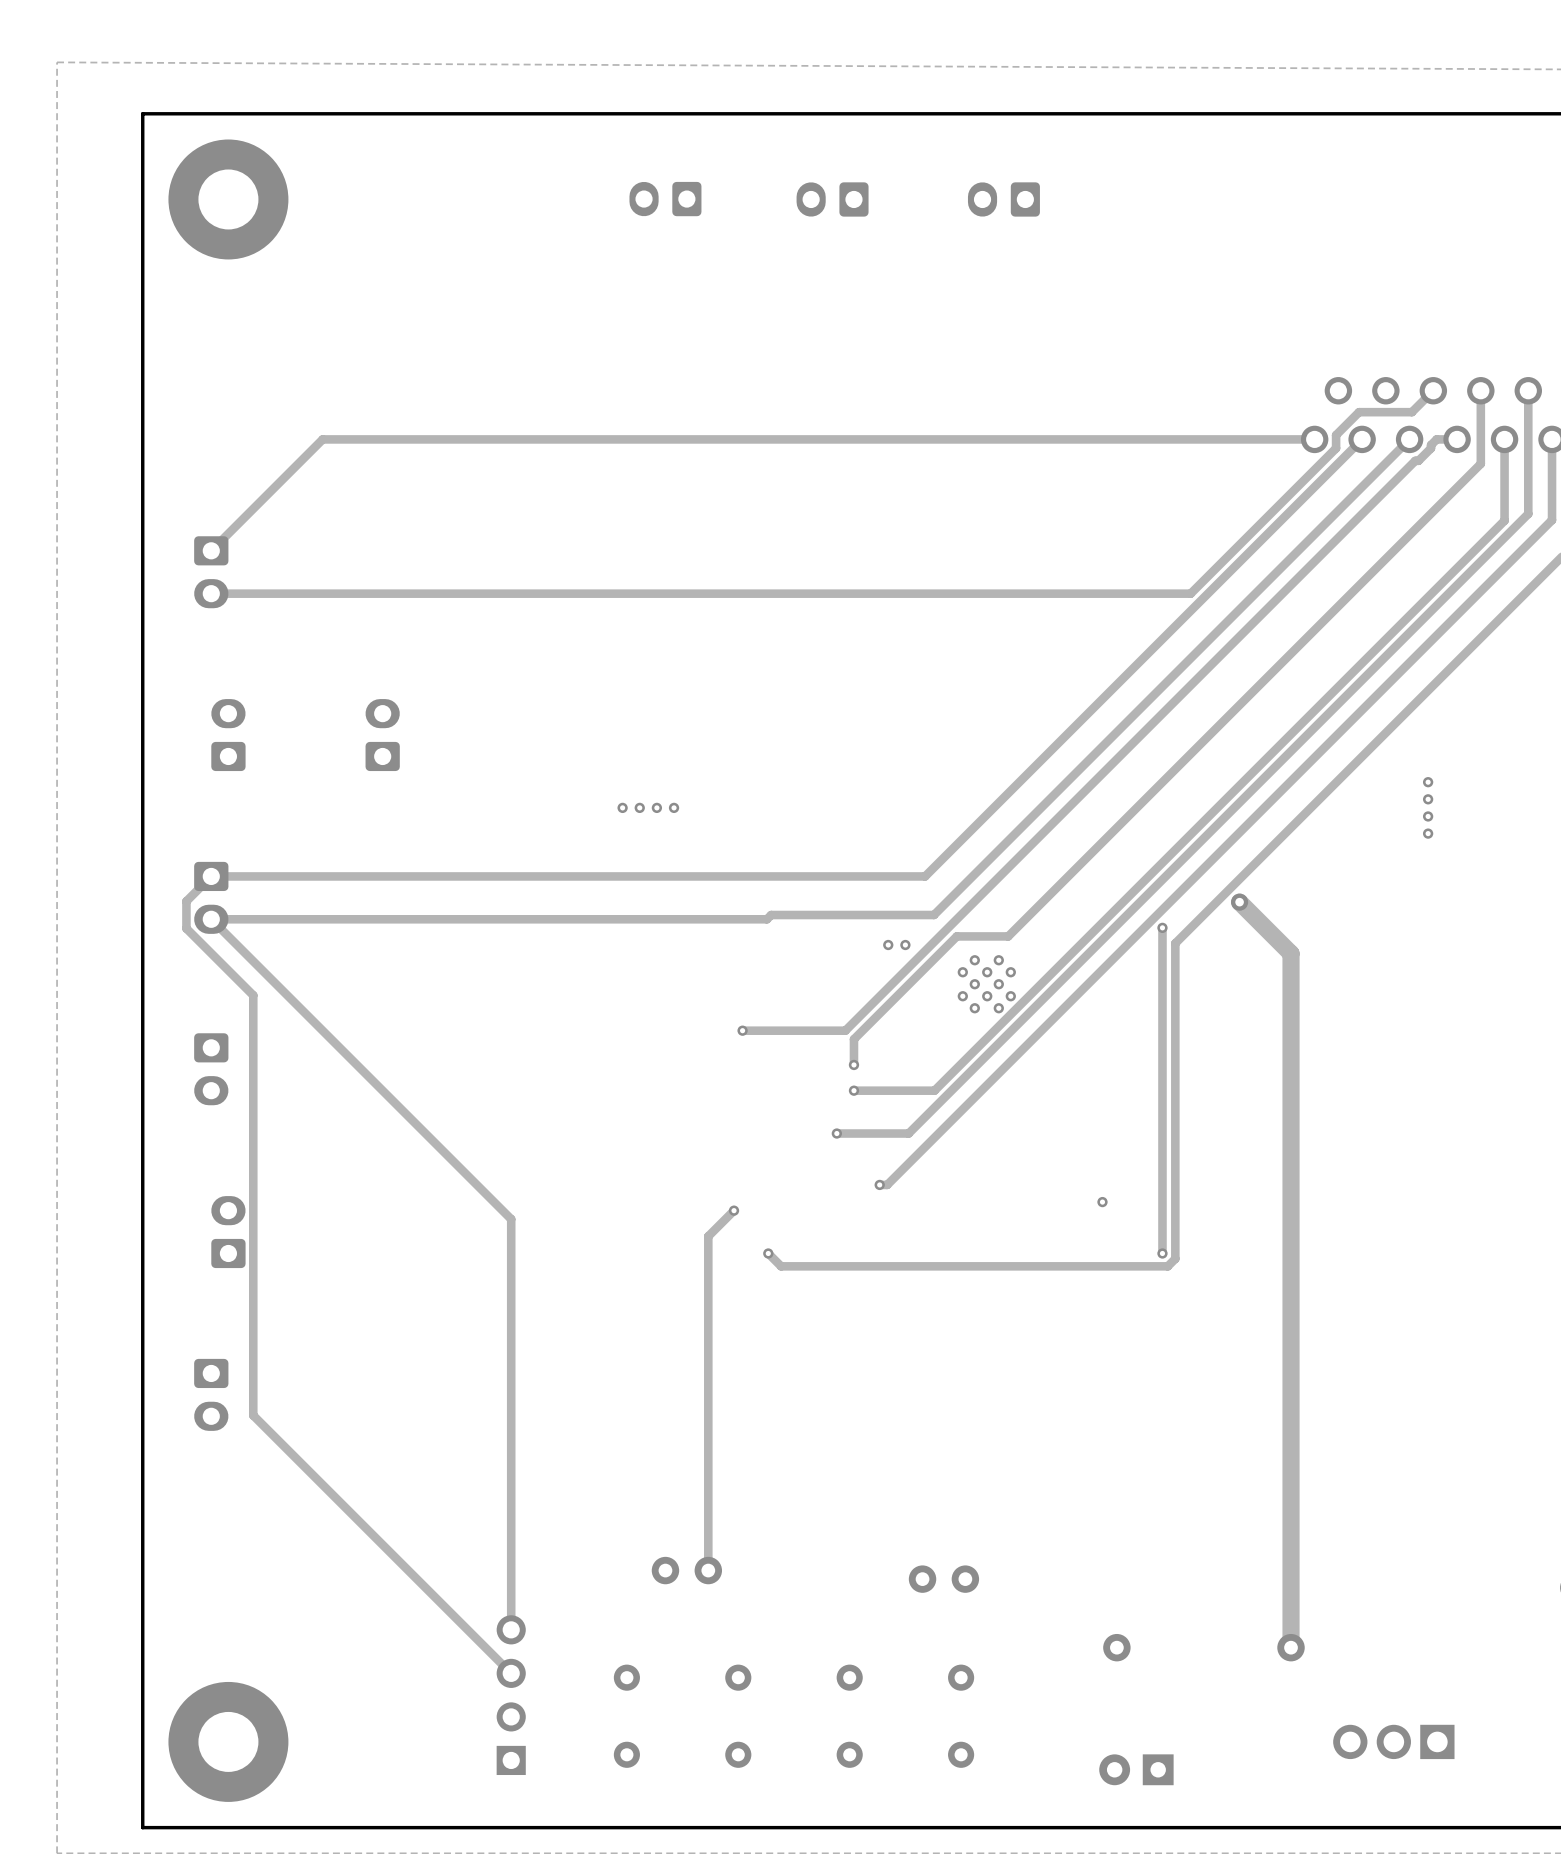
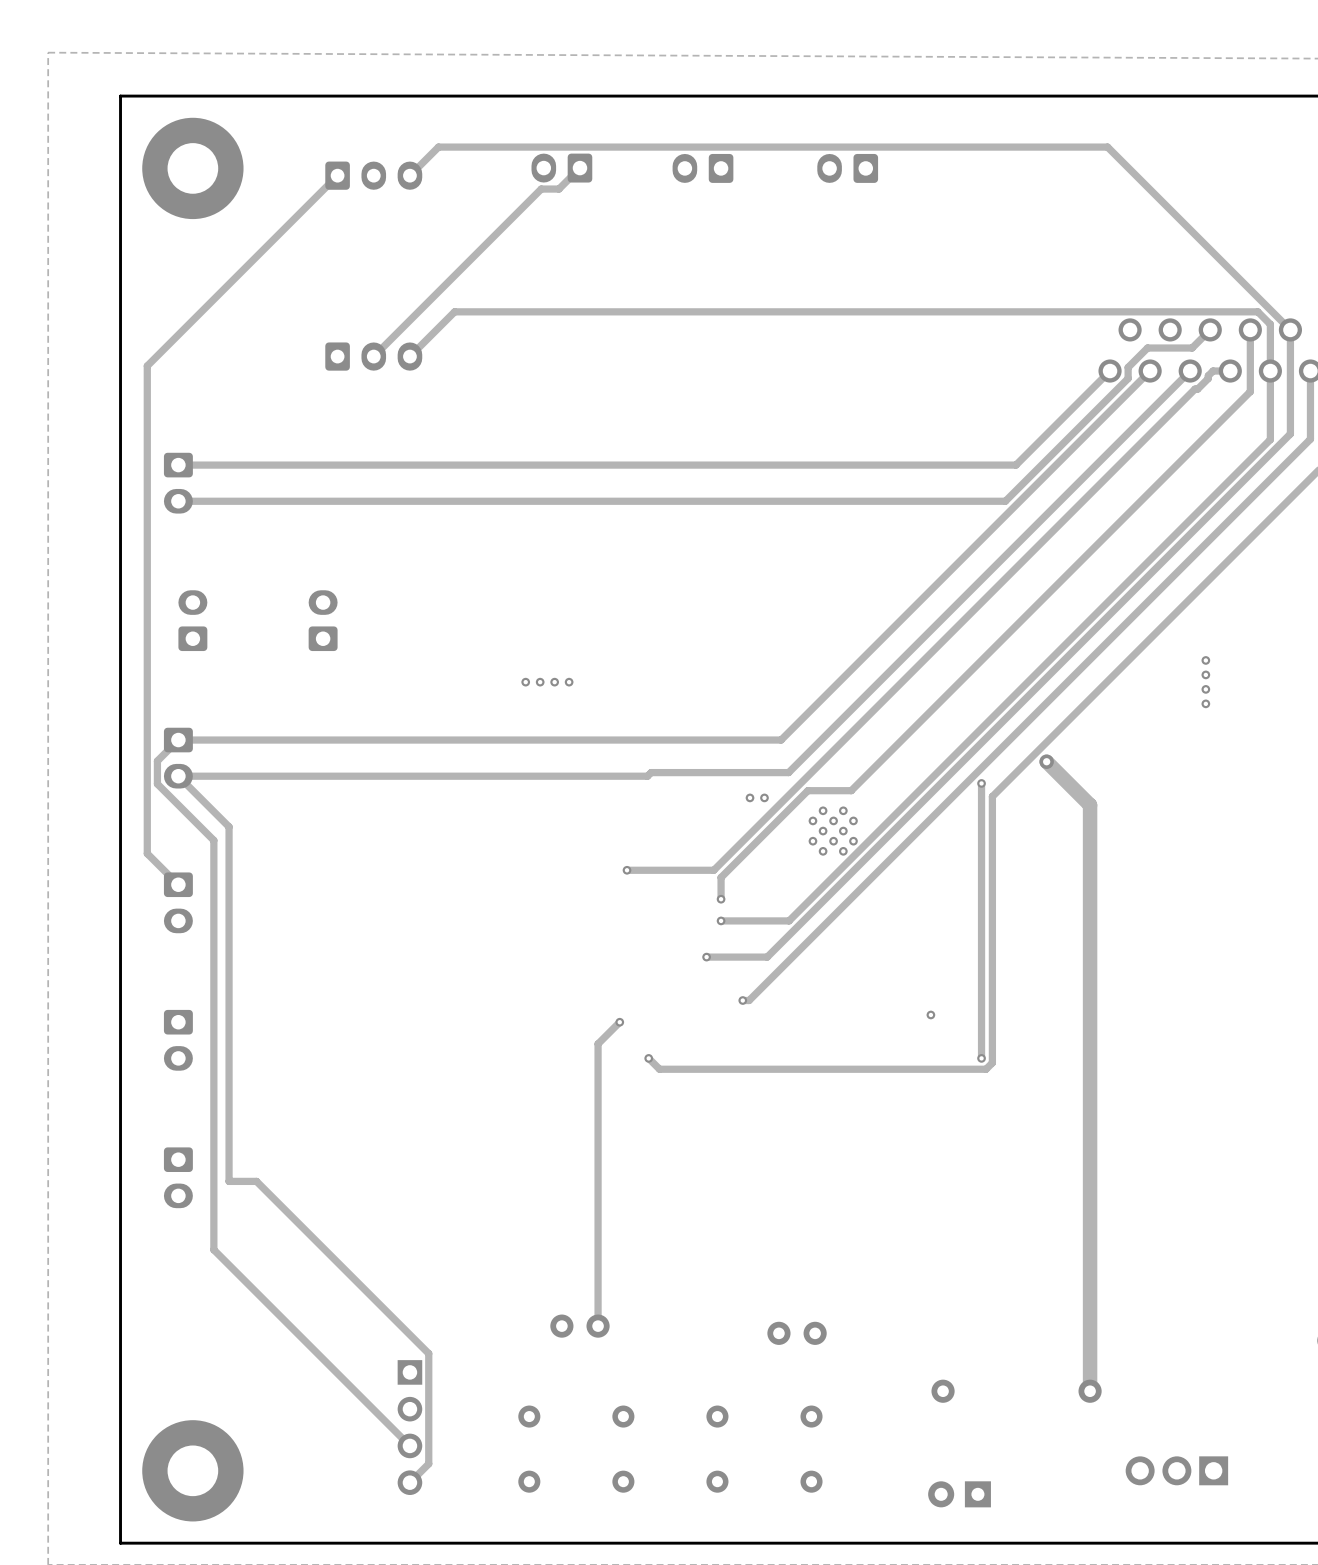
track: none -> (579, 168) (558, 189) (541, 189) (373, 356)
track: none -> (337, 175) (147, 365) (147, 853) (178, 884)
part: none -> (373, 175)
track: none -> (409, 175) (438, 147) (1107, 147) (1290, 329)
part: none -> (373, 356)
track: none -> (409, 356) (454, 311) (1257, 311) (1270, 324) (1270, 371)
track: (1314, 439) (322, 439) (211, 550) -> (1110, 371) (1015, 465) (178, 465)
track: (271, 979) (511, 1219) (511, 1629) -> (229, 826) (229, 1181) (256, 1181) (428, 1353) (428, 1463) (409, 1482)
part rotation: 0° (228, 1232) -> 180° (178, 1040)
track: (253, 1415) (511, 1673) -> (213, 1195) (213, 1249) (409, 1445)
part rotation: 0° (511, 1695) -> 180° (409, 1427)

